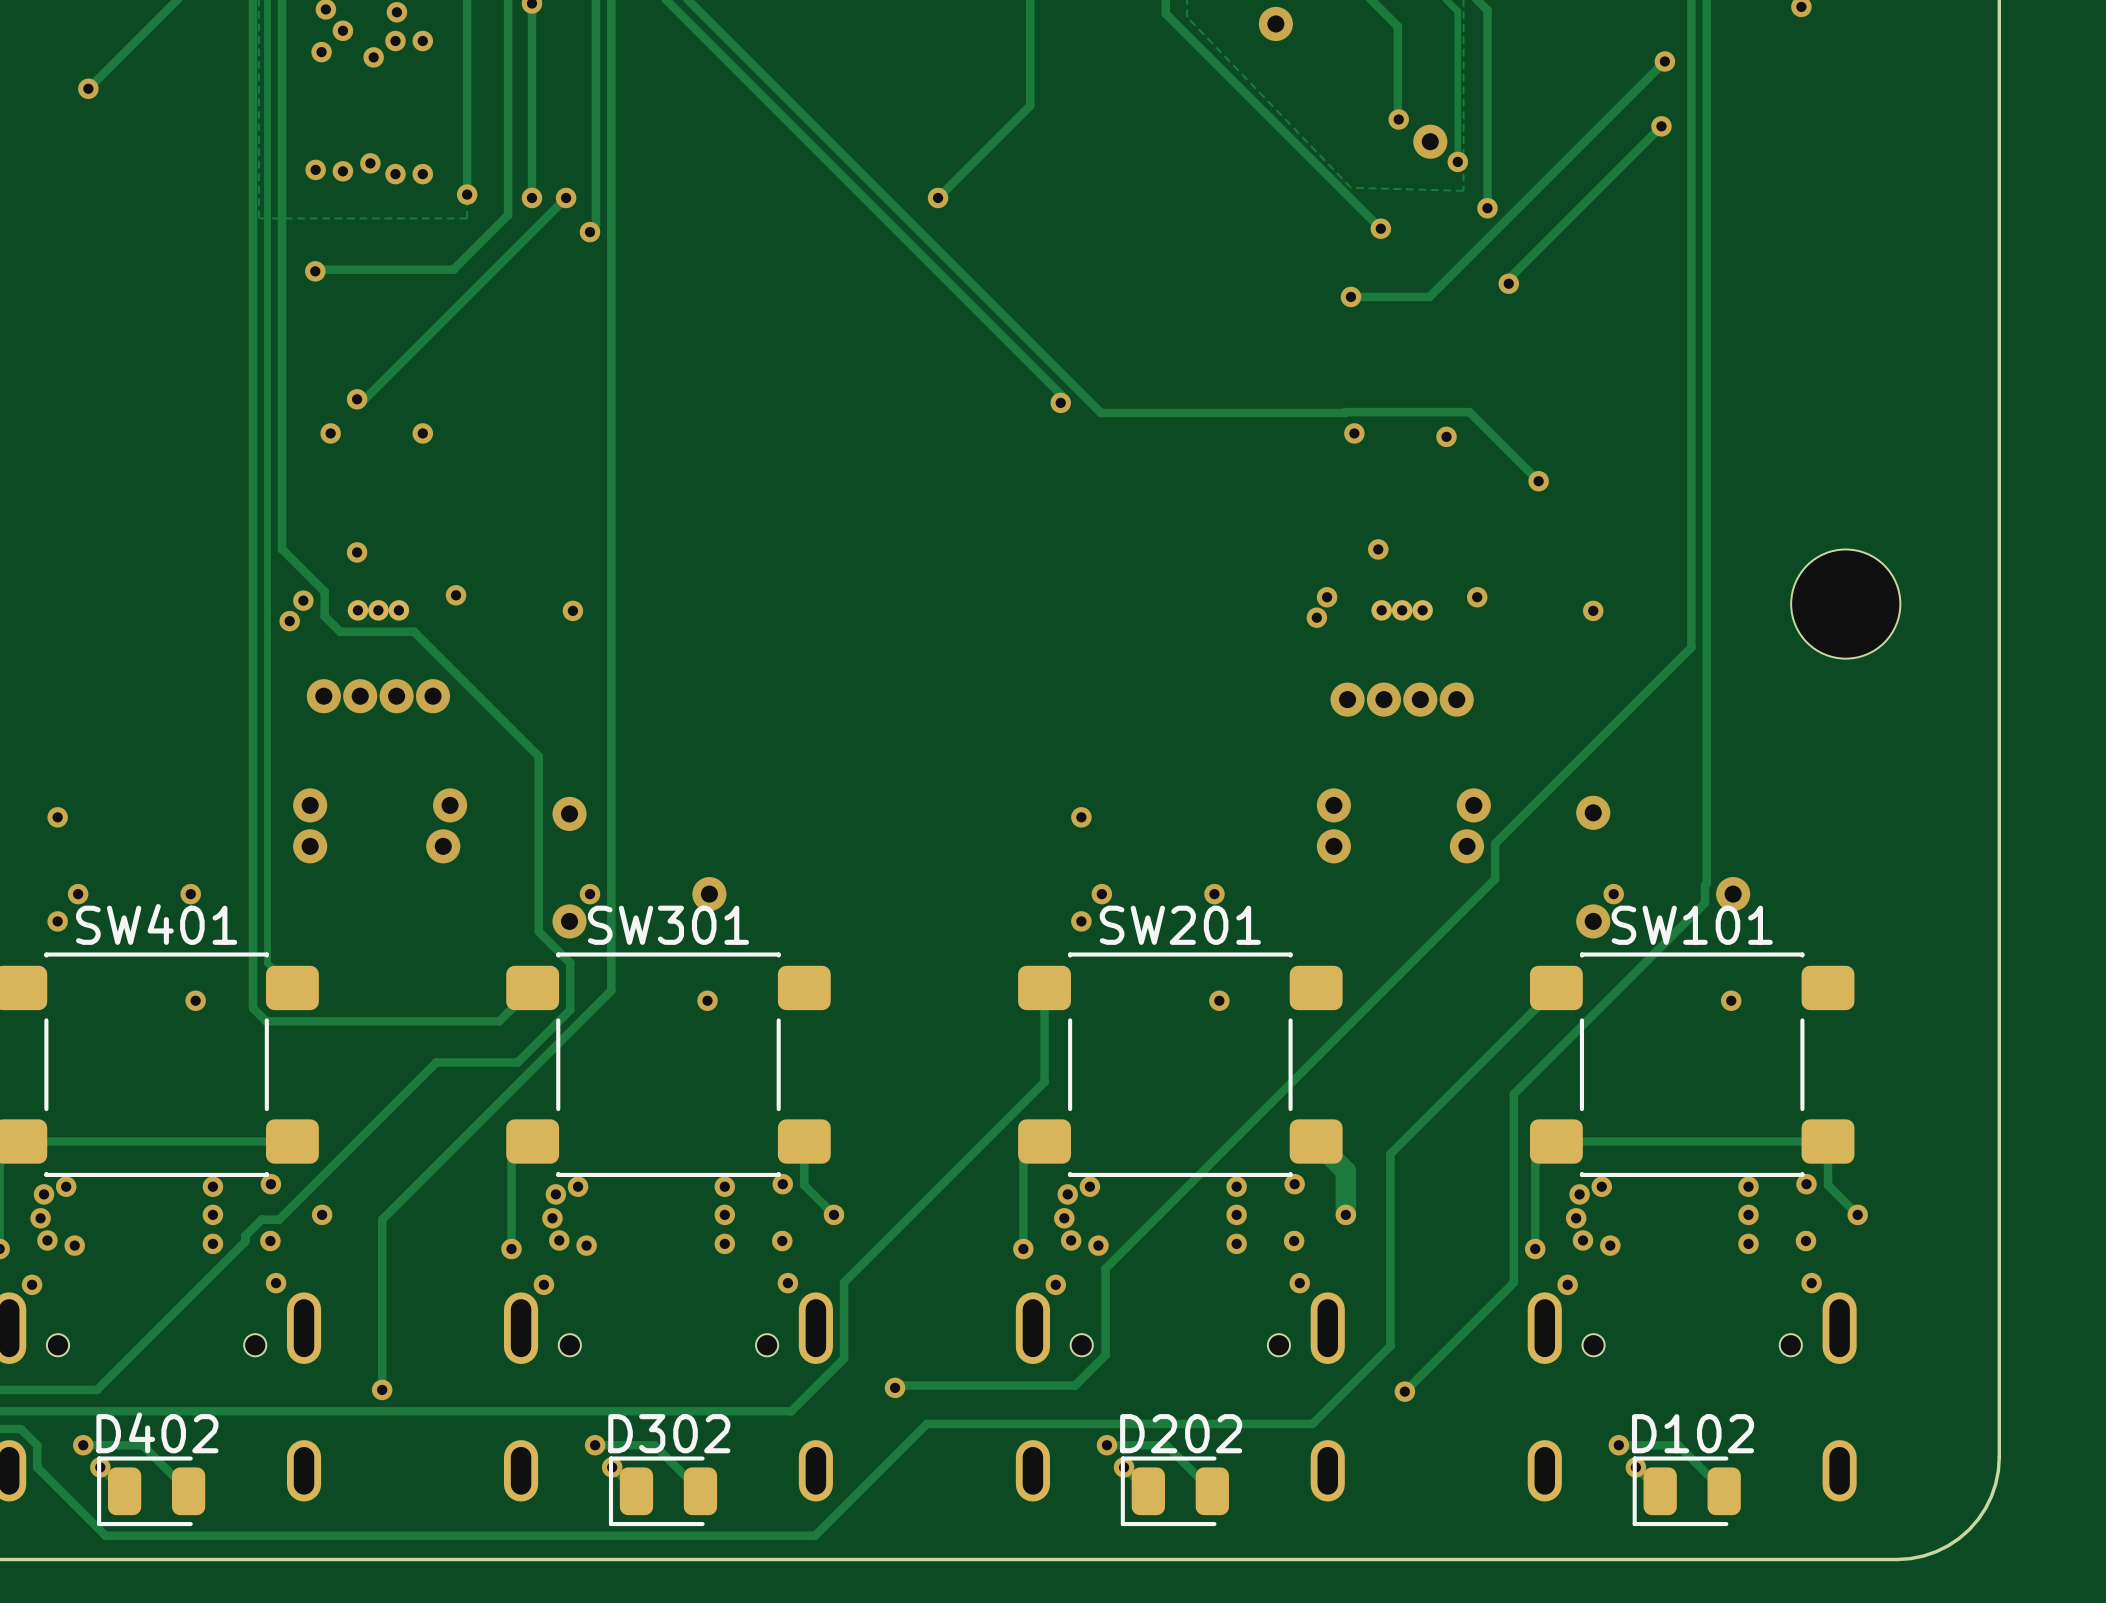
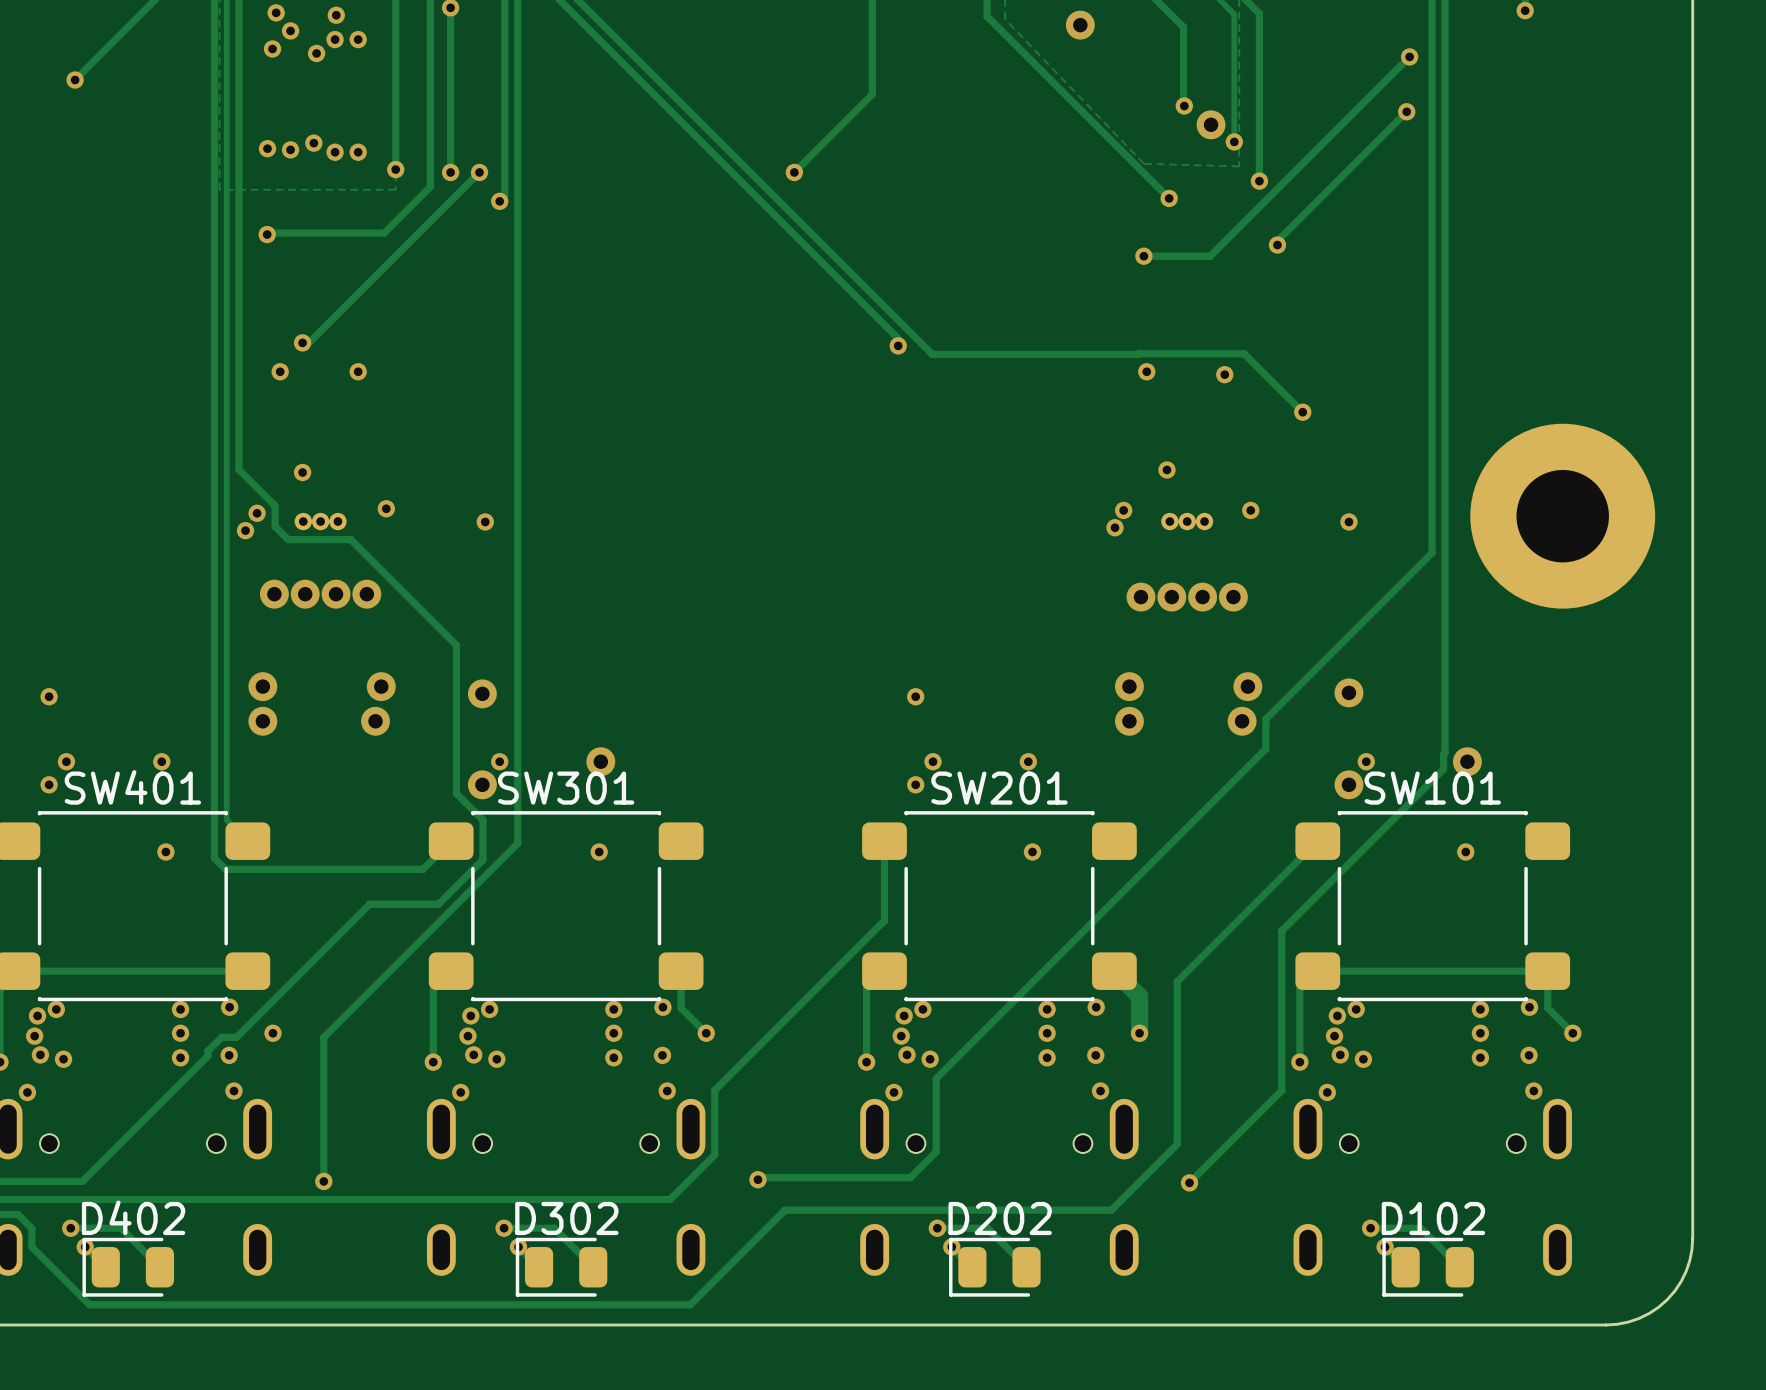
part footprint: [1791, 549, 1901, 659] -> [1470, 423, 1656, 609]

